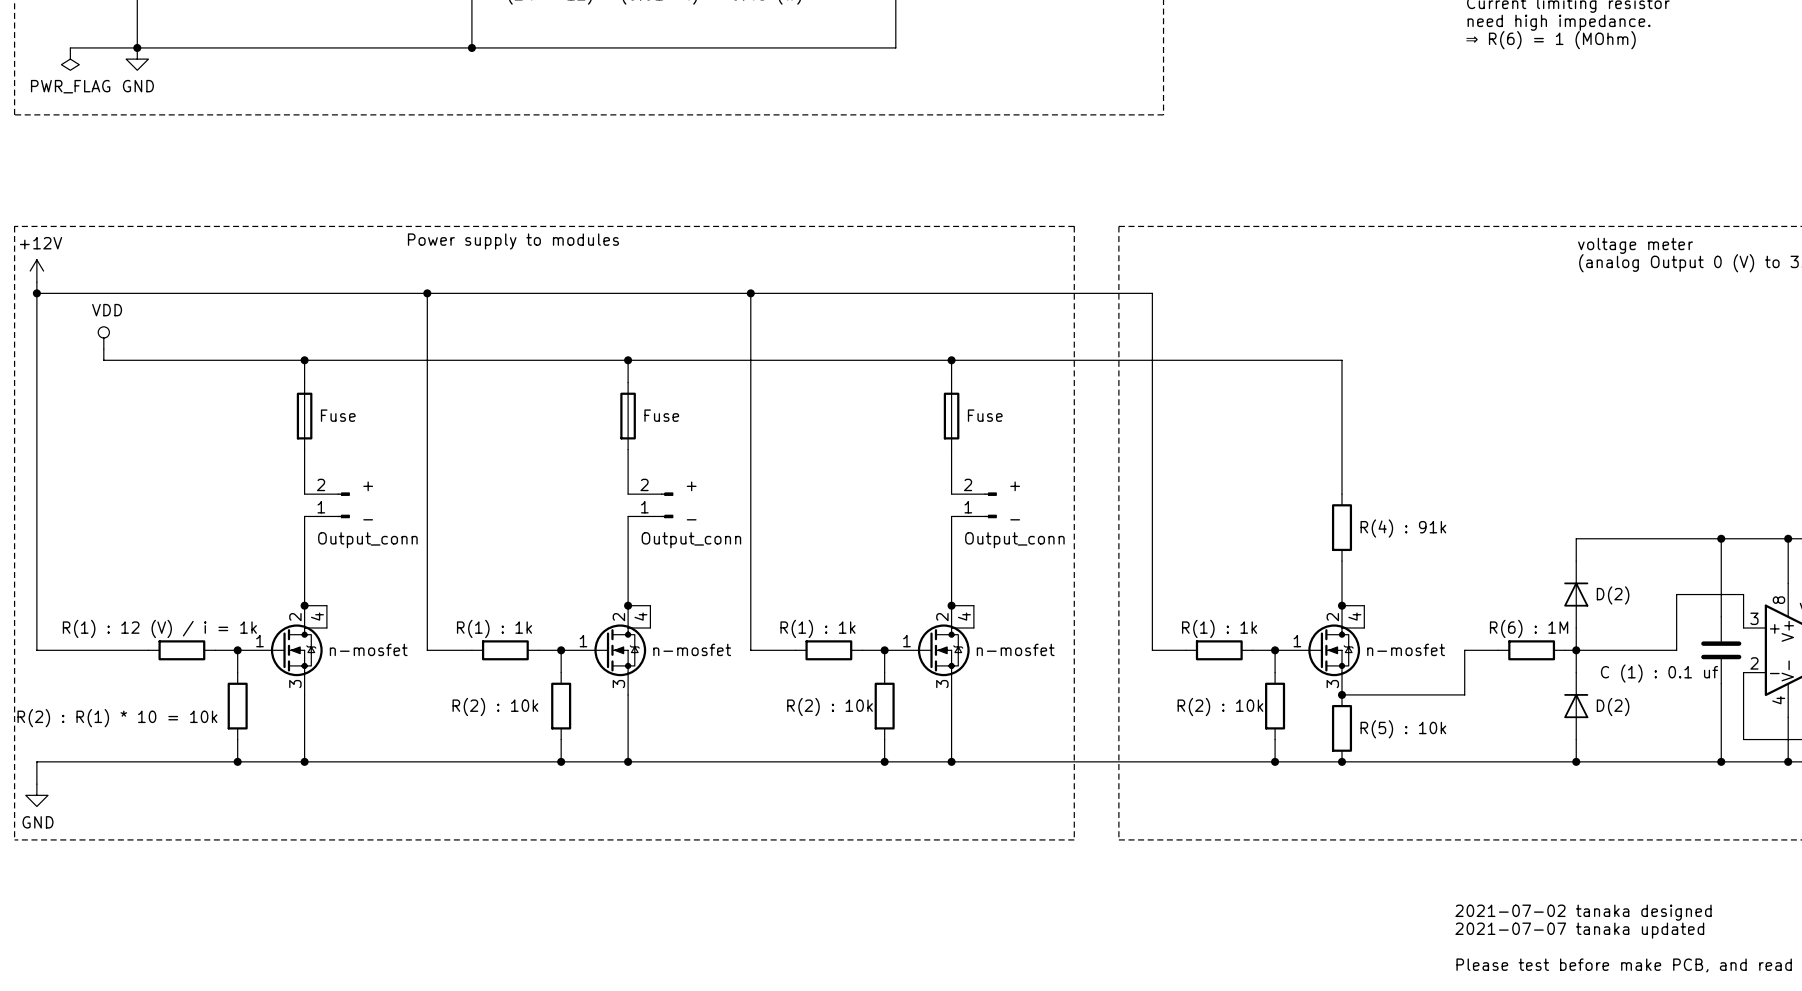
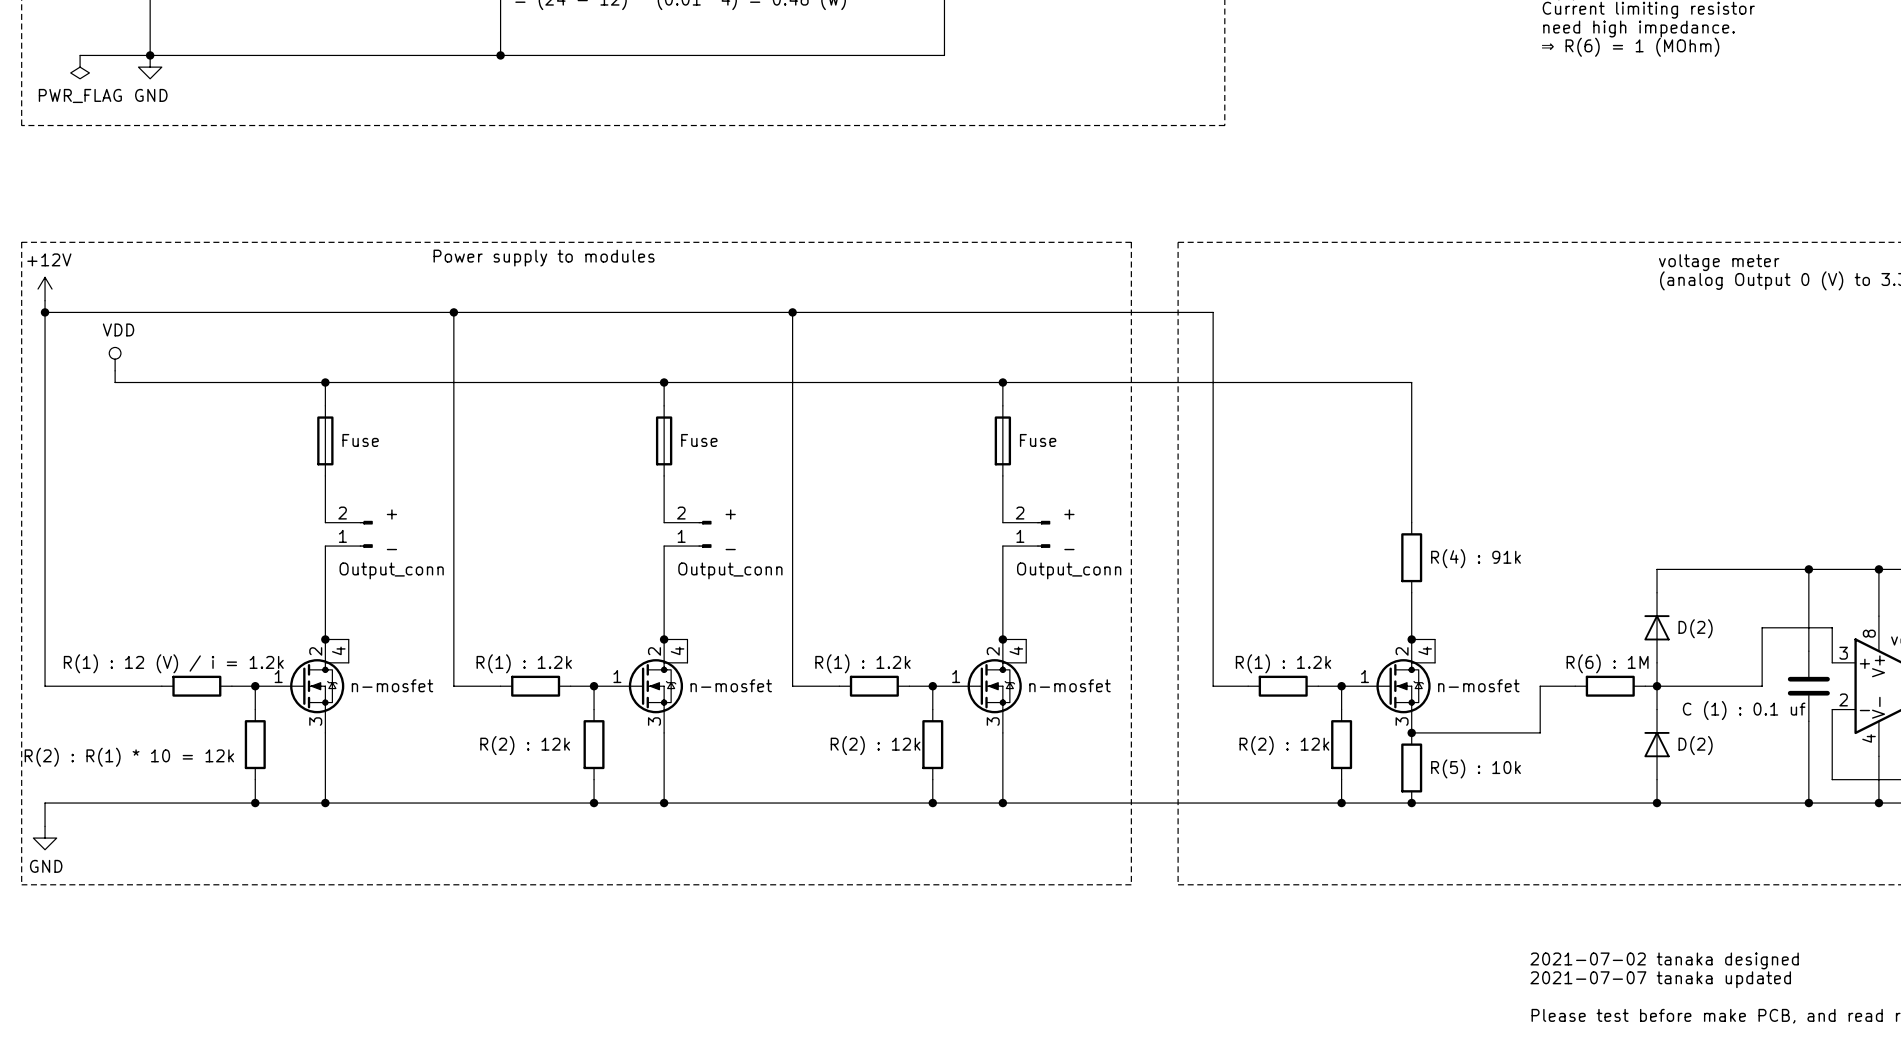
part value: R(1) : 12 (V) / i = 1k (159, 628) -> R(1) : 12 (V) / i = 1.2k (173, 663)
part value: R(1) : 1k (494, 628) -> R(1) : 1.2k (524, 663)
part value: R(1) : 1k (817, 628) -> R(1) : 1.2k (862, 663)
part value: R(1) : 1k (1219, 628) -> R(1) : 1.2k (1283, 663)
part value: R(2) : 10k (495, 707) -> R(2) : 12k (525, 745)
part value: R(2) : 10k (830, 707) -> R(2) : 12k (875, 745)
part value: R(2) : 10k (1220, 707) -> R(2) : 12k (1284, 745)
part value: R(2) : R(1) * 10 = 10k (117, 718) -> R(2) : R(1) * 10 = 12k (129, 757)

